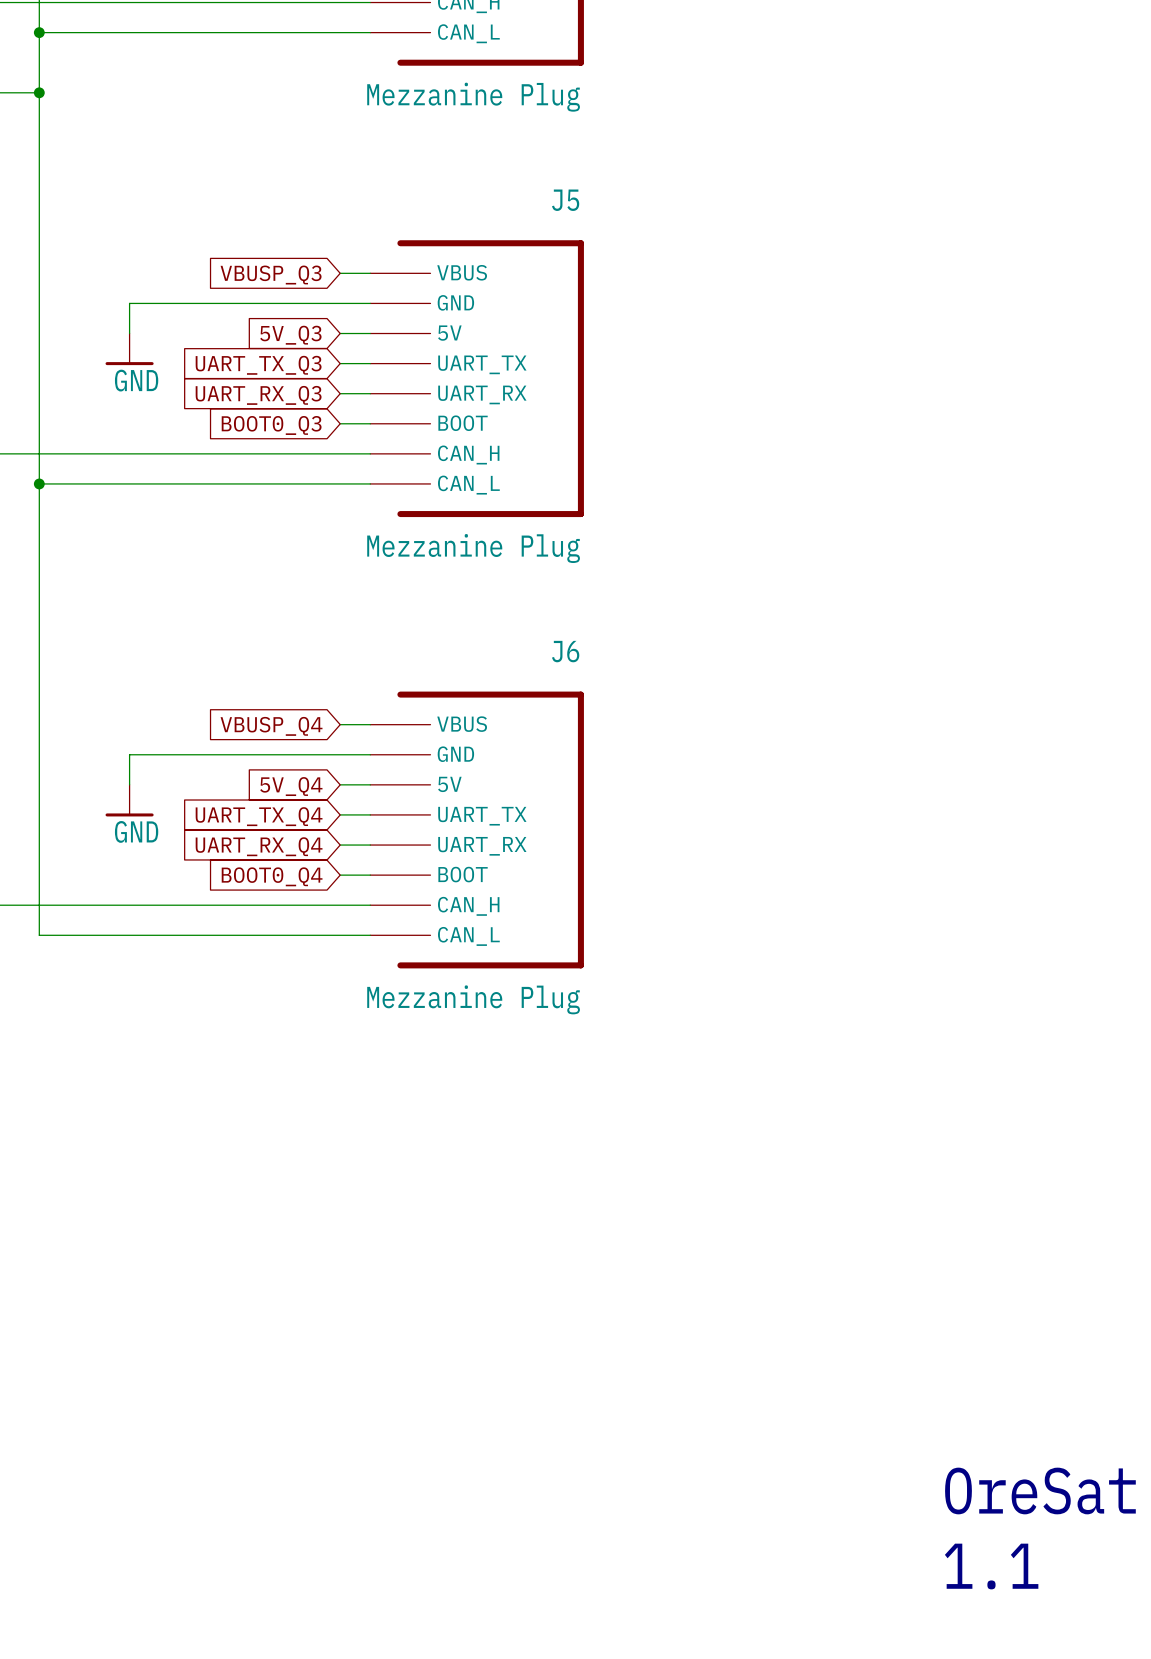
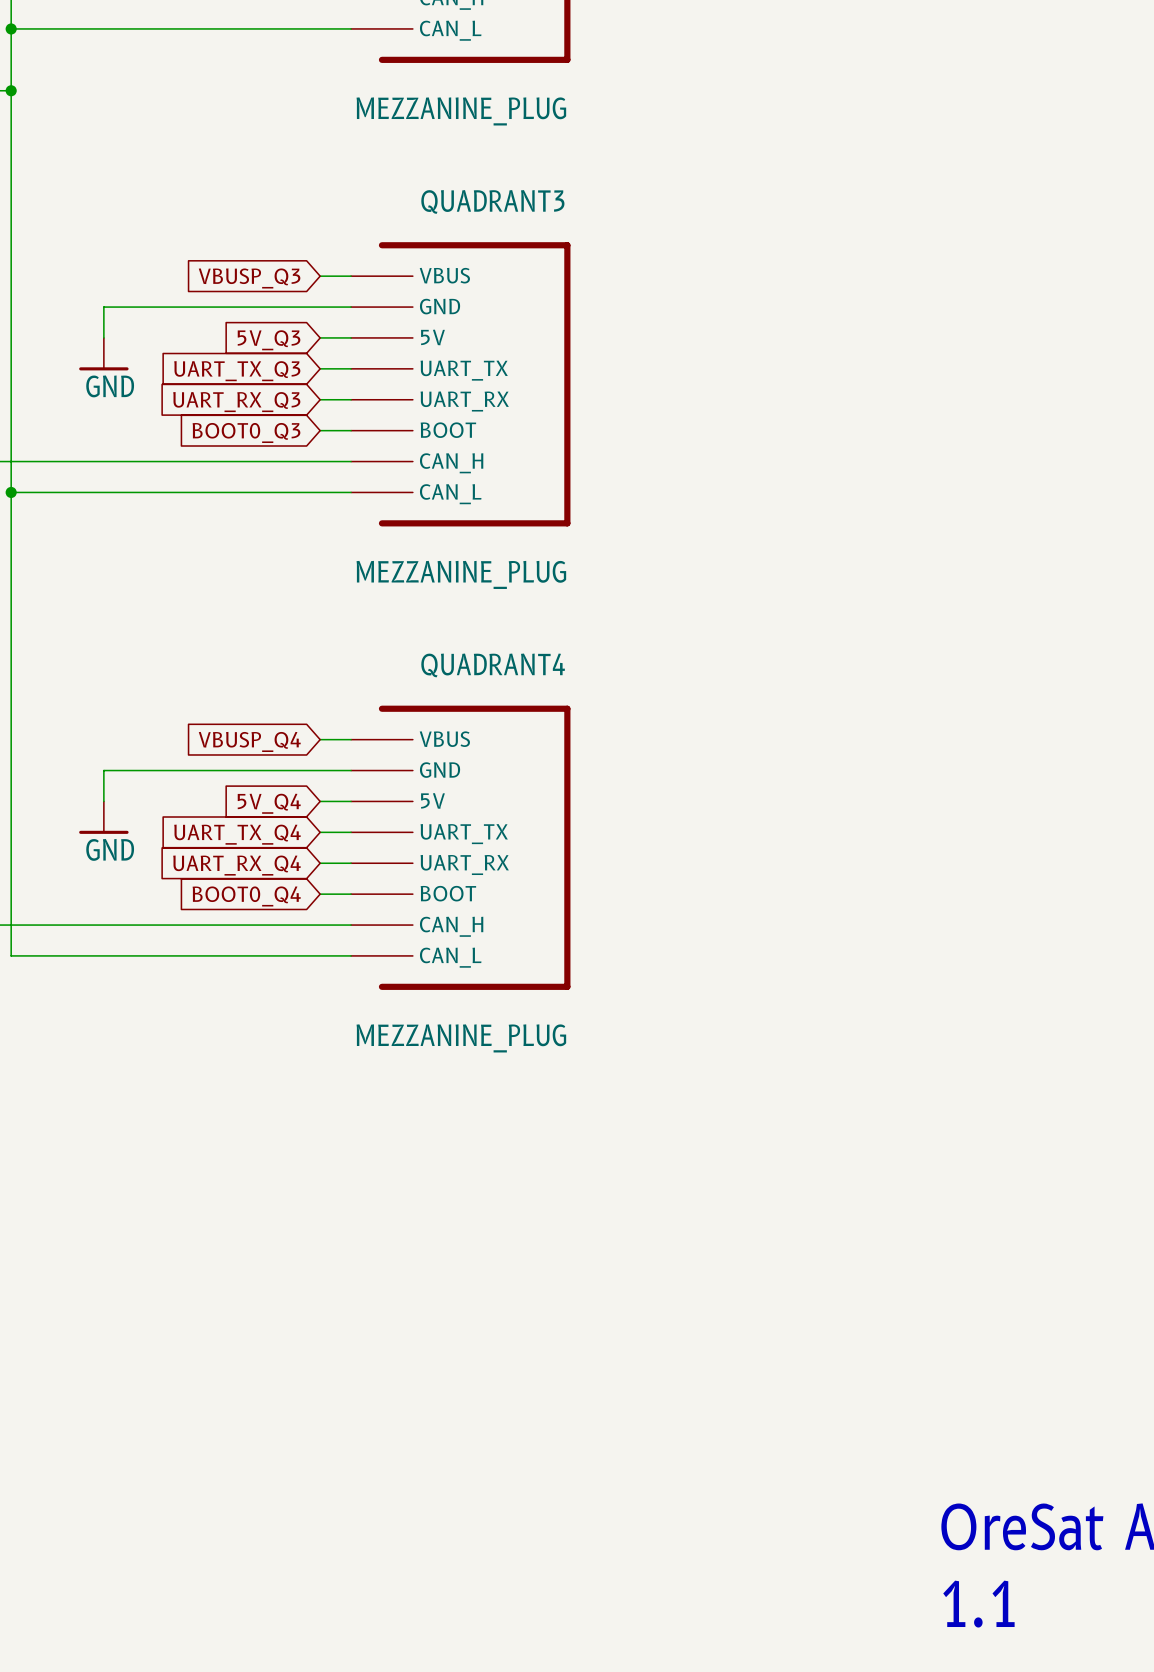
part value: Mezzanine Plug (473, 97) -> MEZZANINE_PLUG (461, 111)
J5 name: J5 (565, 200) -> QUADRANT3 (492, 201)
J5 value: Mezzanine Plug (473, 548) -> MEZZANINE_PLUG (461, 574)
J6 name: J6 (565, 651) -> QUADRANT4 (493, 665)
J6 value: Mezzanine Plug (473, 999) -> MEZZANINE_PLUG (461, 1038)

